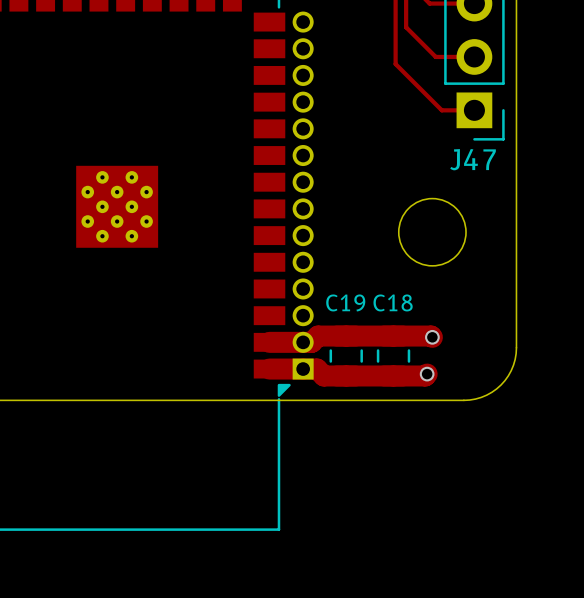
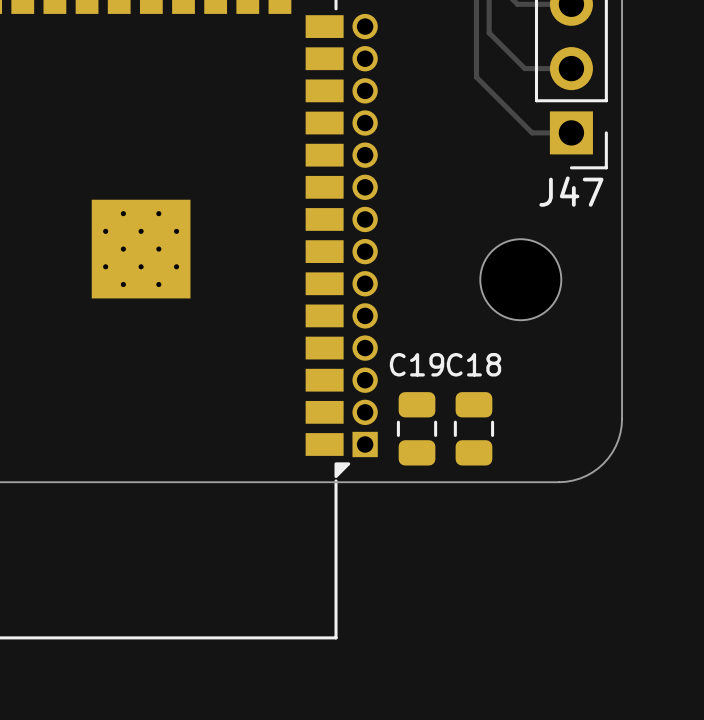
track: (432, 337) (318, 336) (311, 342) (269, 342) -> none
via: (432, 337) -> none
track: (269, 369) (317, 369) (323, 375) (425, 375) (427, 374) -> none
via: (427, 374) -> none

